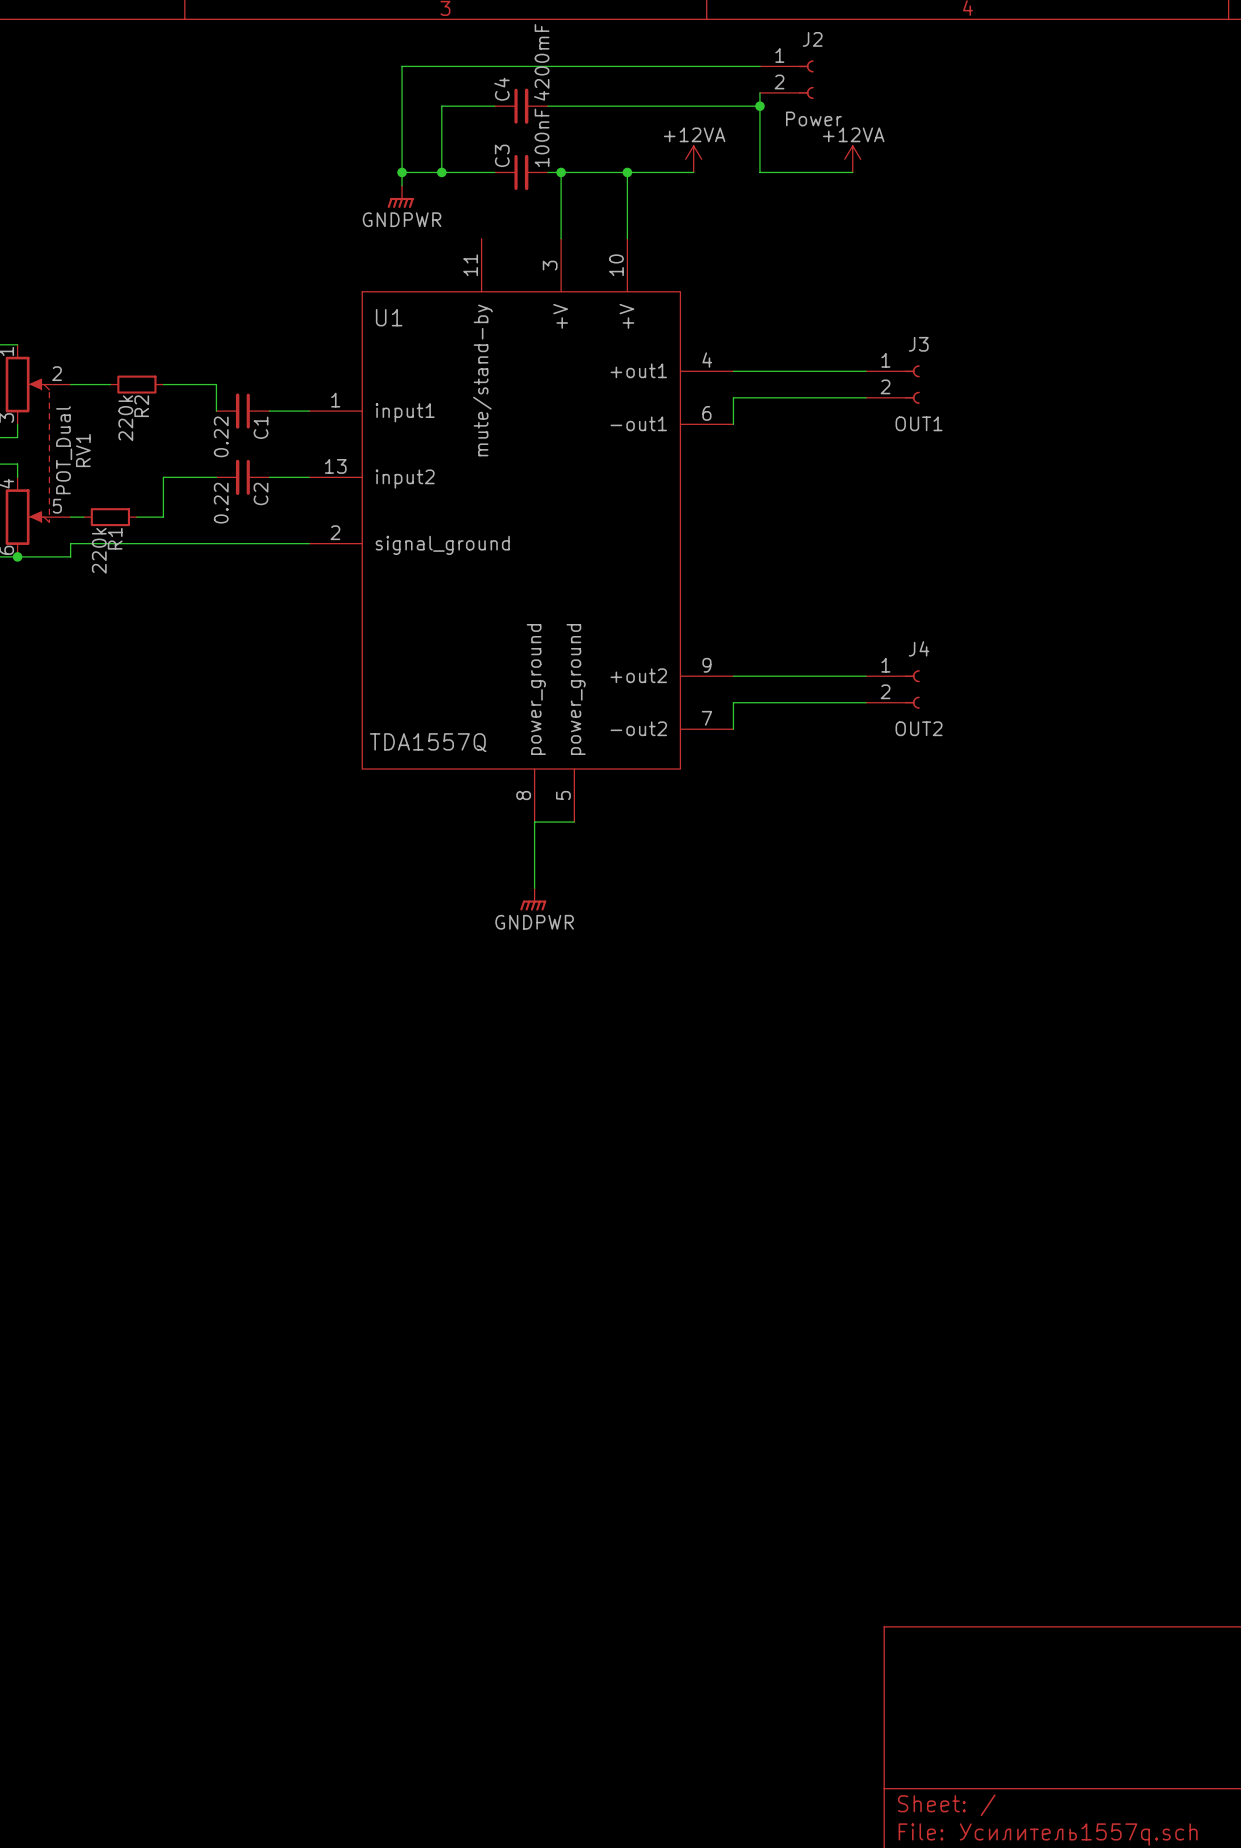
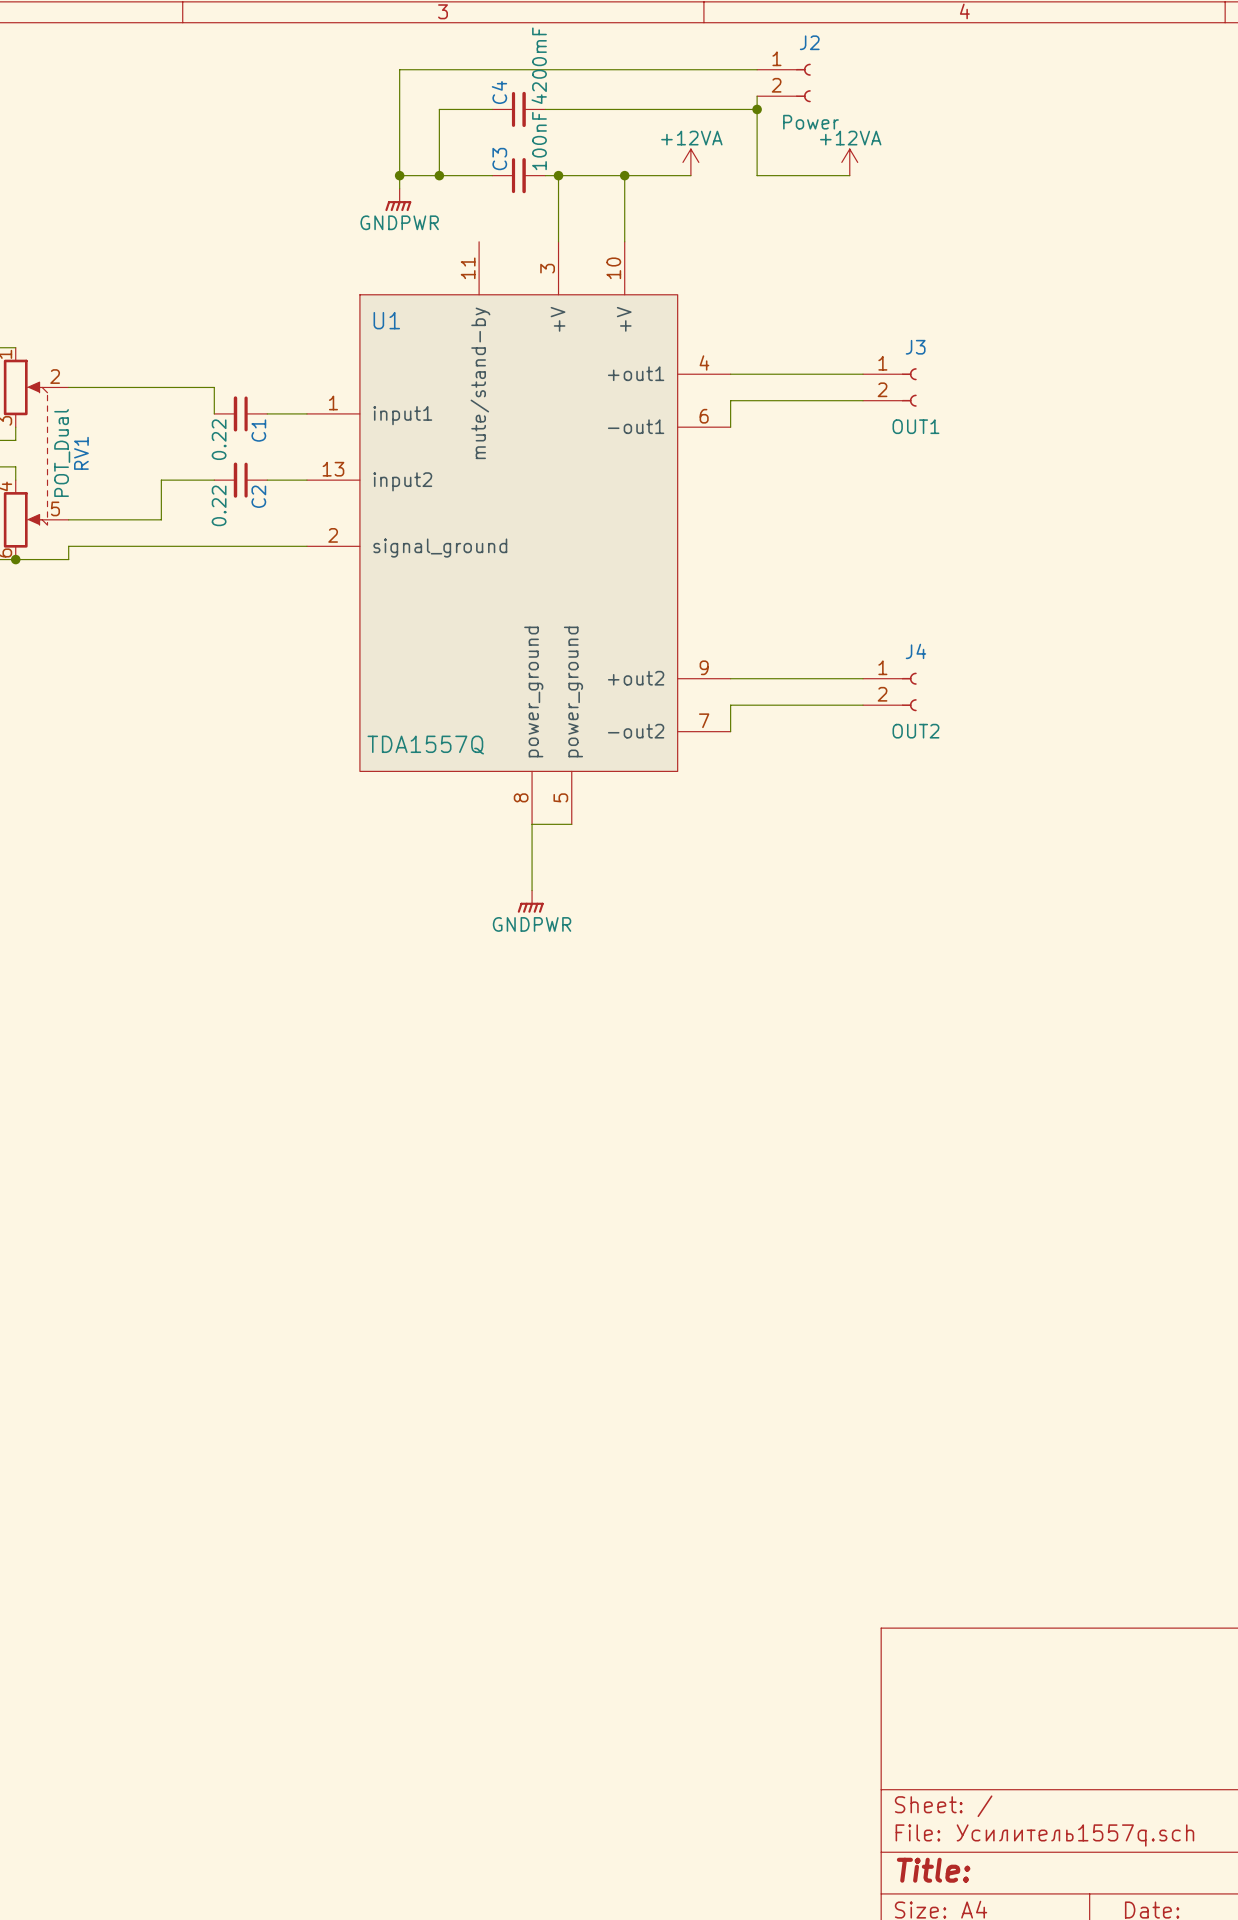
wire: none -> (108, 387) (161, 387)
R2: 220k (136, 384) -> none
wire: none -> (81, 519) (134, 519)
R1: 220k (110, 517) -> none

